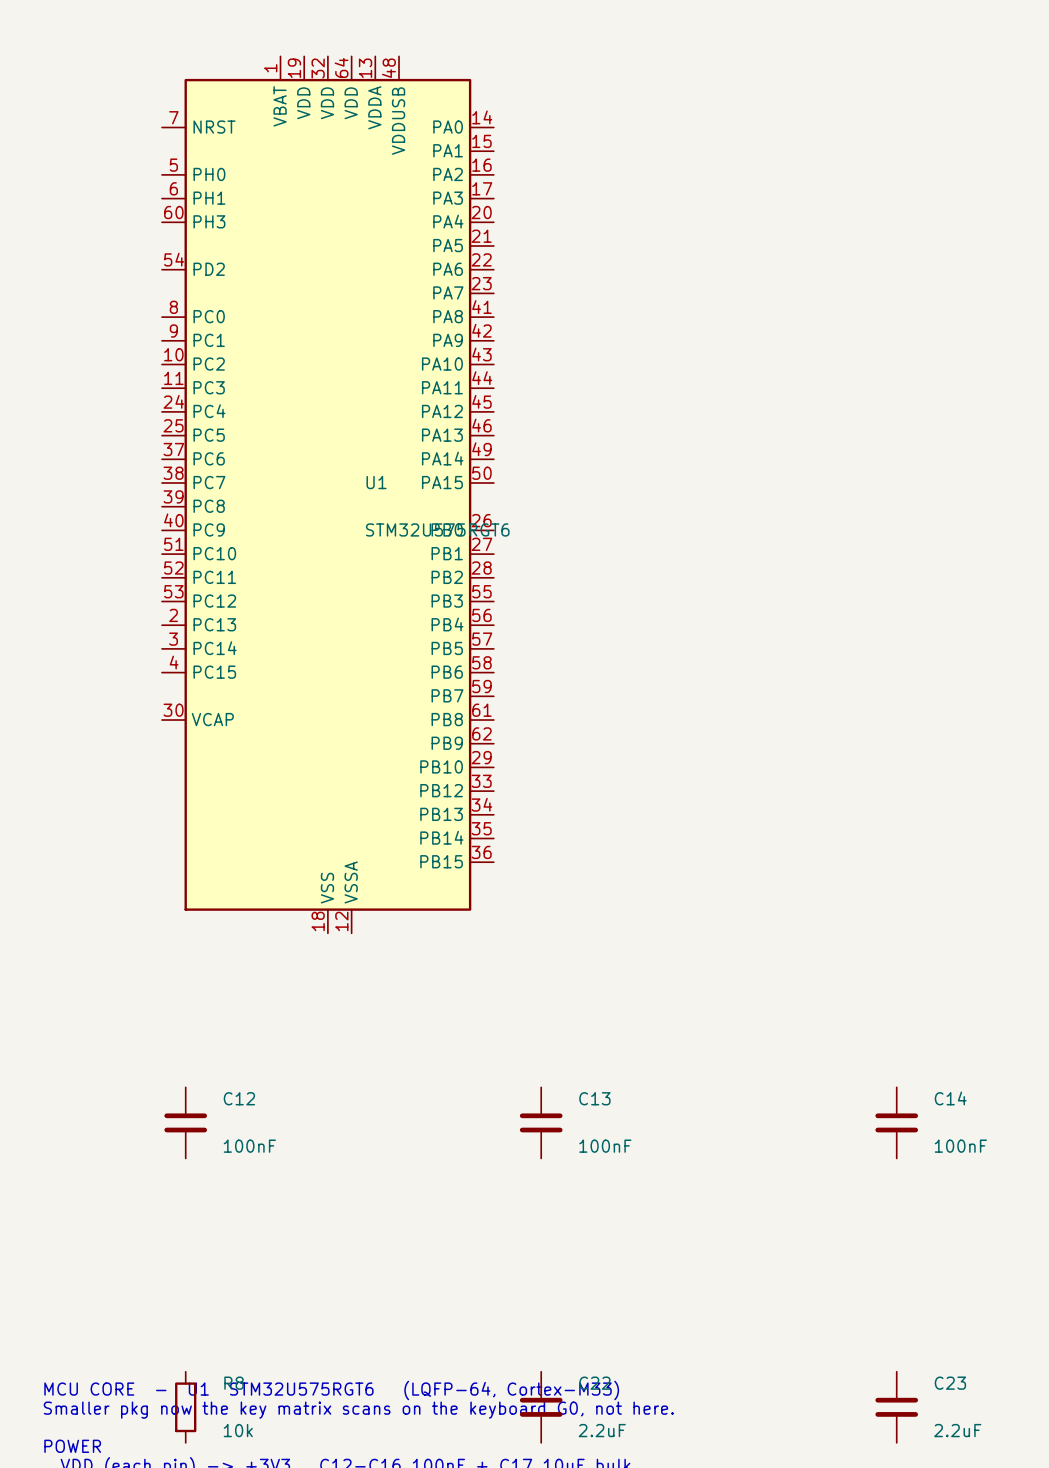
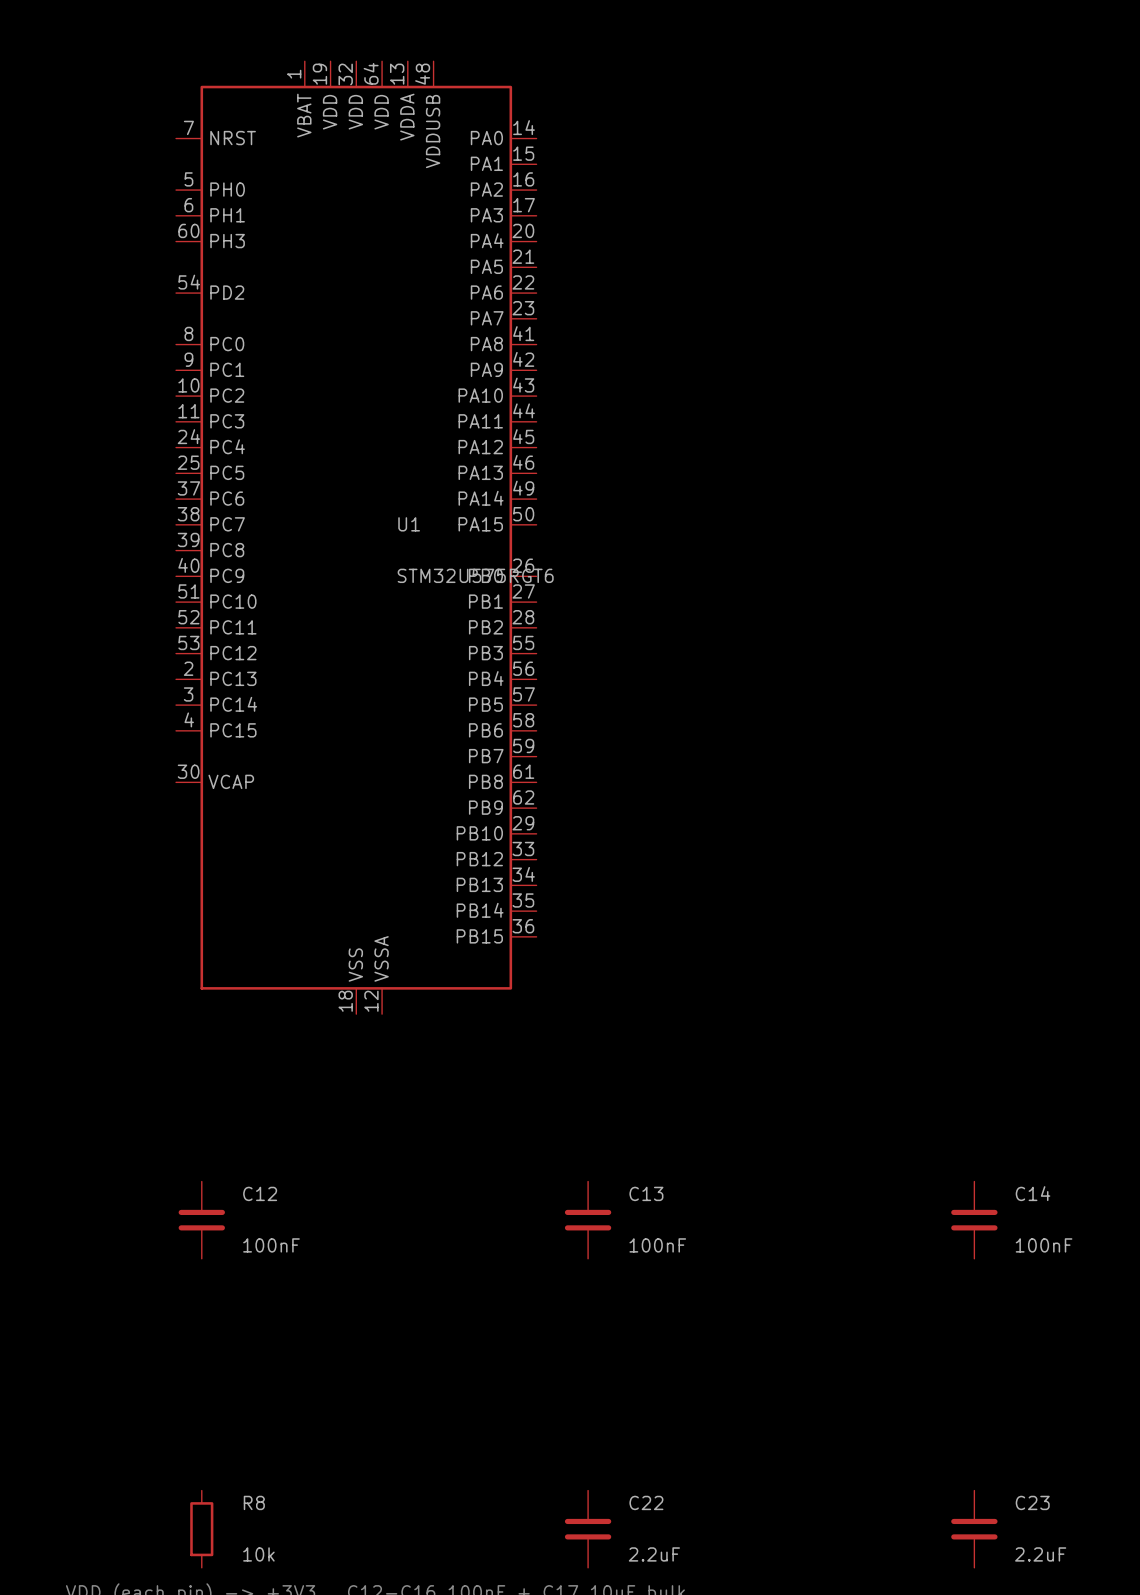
text: MCU CORE - U1 STM32U575RGT6 (LQFP-64, Cortex-M33) (331, 1390) -> none
text: Smaller pkg now the key matrix scans on the keyboard G0, not here. (358, 1410) -> none
text: POWER (72, 1446) -> none

